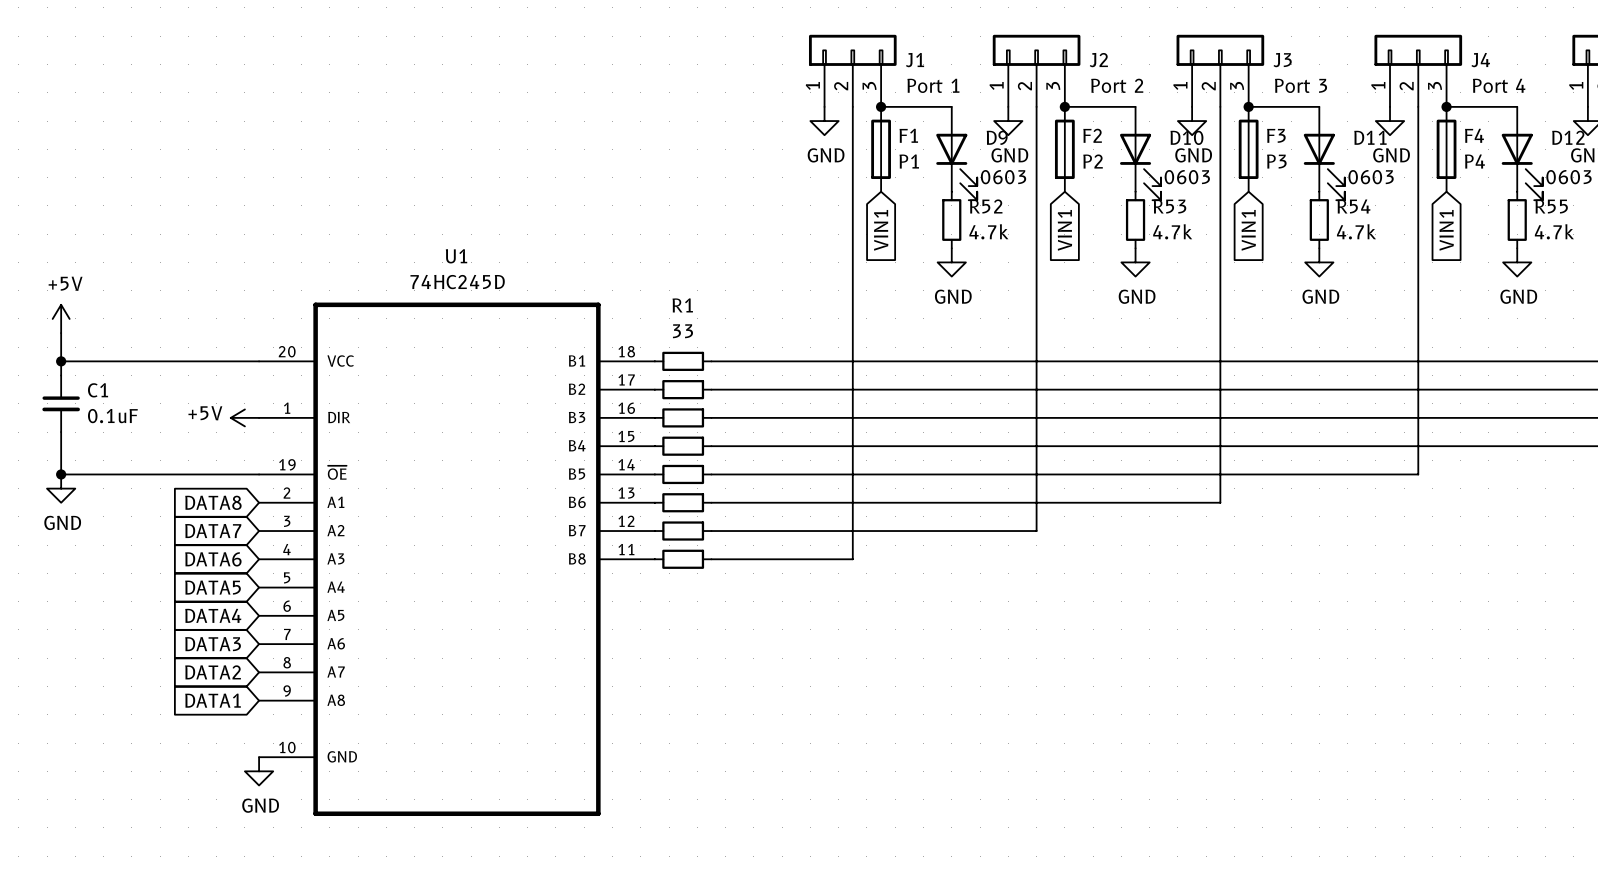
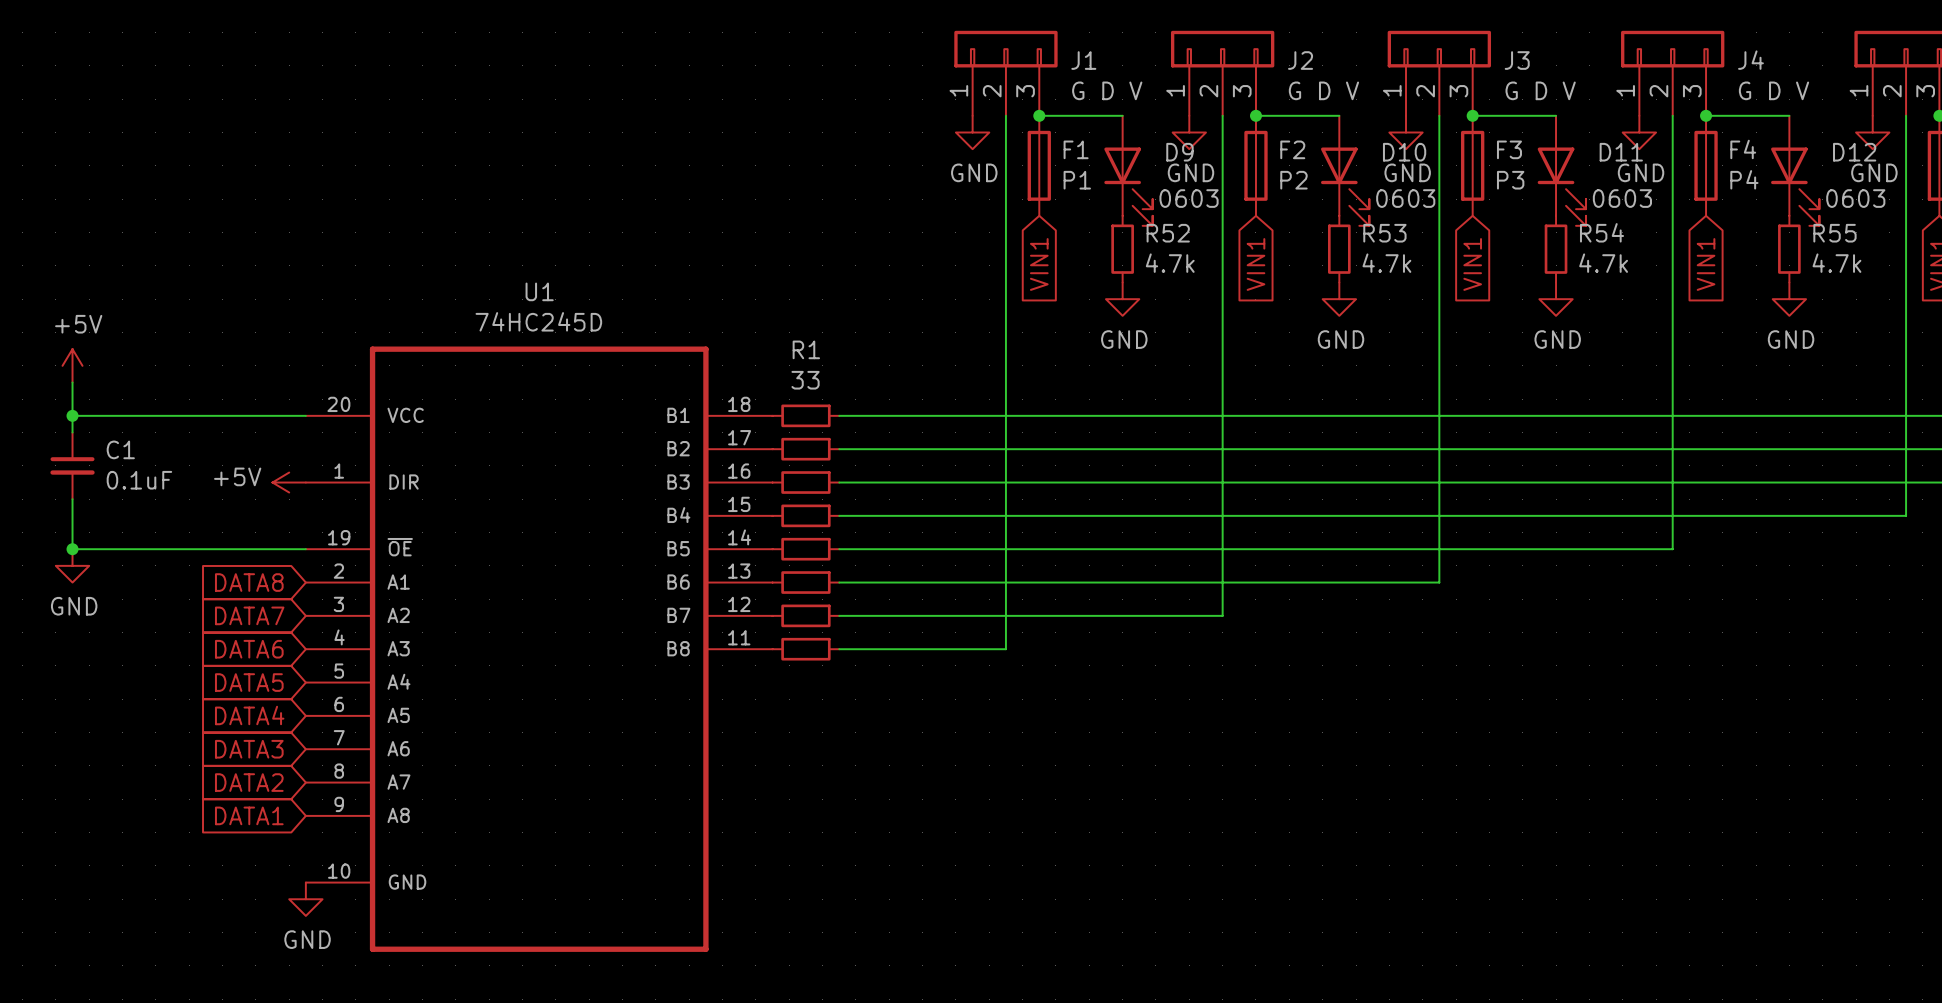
J1 value: Port 1 (933, 85) -> G D V (1107, 90)
J2 value: Port 2 (1117, 85) -> G D V (1323, 90)
J3 value: Port 3 (1301, 85) -> G D V (1540, 90)
J4 value: Port 4 (1499, 85) -> G D V (1774, 90)

